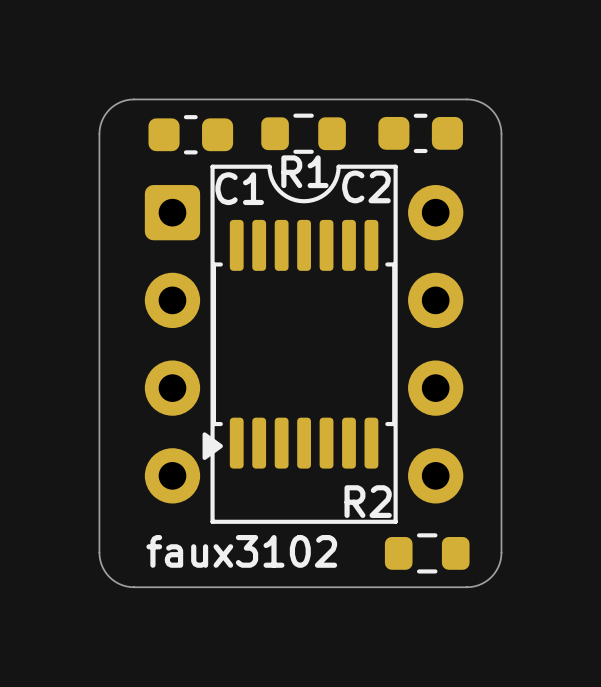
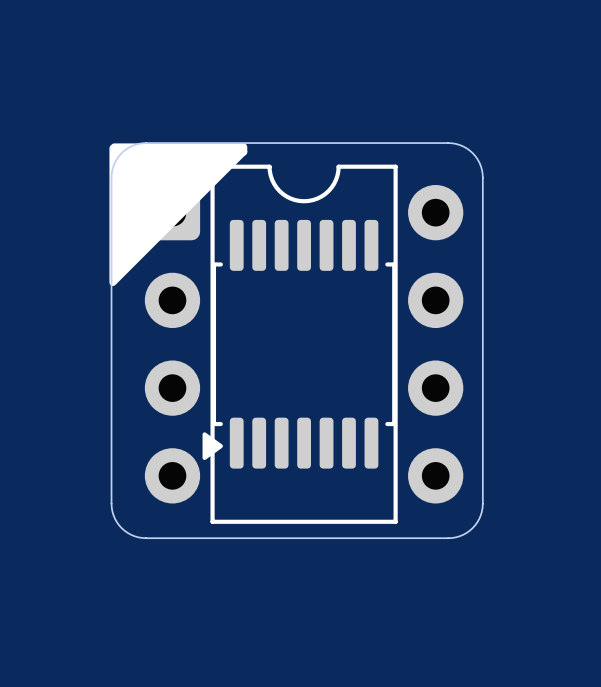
board edge: (133, 99) (466, 99) (481, 102) (493, 112) (499, 122) (501, 133) (501, 552) (498, 567) (488, 579) (478, 585) (466, 587) (133, 587) (118, 583) (106, 574) (101, 564) (99, 552) (99, 130) (102, 118) (112, 106) (122, 101) (133, 99) -> (146, 143) (131, 146) (121, 153) (114, 162) (111, 173) (111, 503) (113, 515) (119, 525) (131, 534) (146, 538) (448, 538) (459, 536) (469, 530) (479, 518) (482, 503) (482, 177) (480, 166) (475, 156) (463, 146) (448, 143) (146, 143)
R1: (303, 133) -> none
C2: (420, 133) -> none
C1: (190, 134) -> none
drawing: none -> [109, 143, 248, 287]
text: faux3102 (241, 551) -> none
R2: (427, 553) -> none

